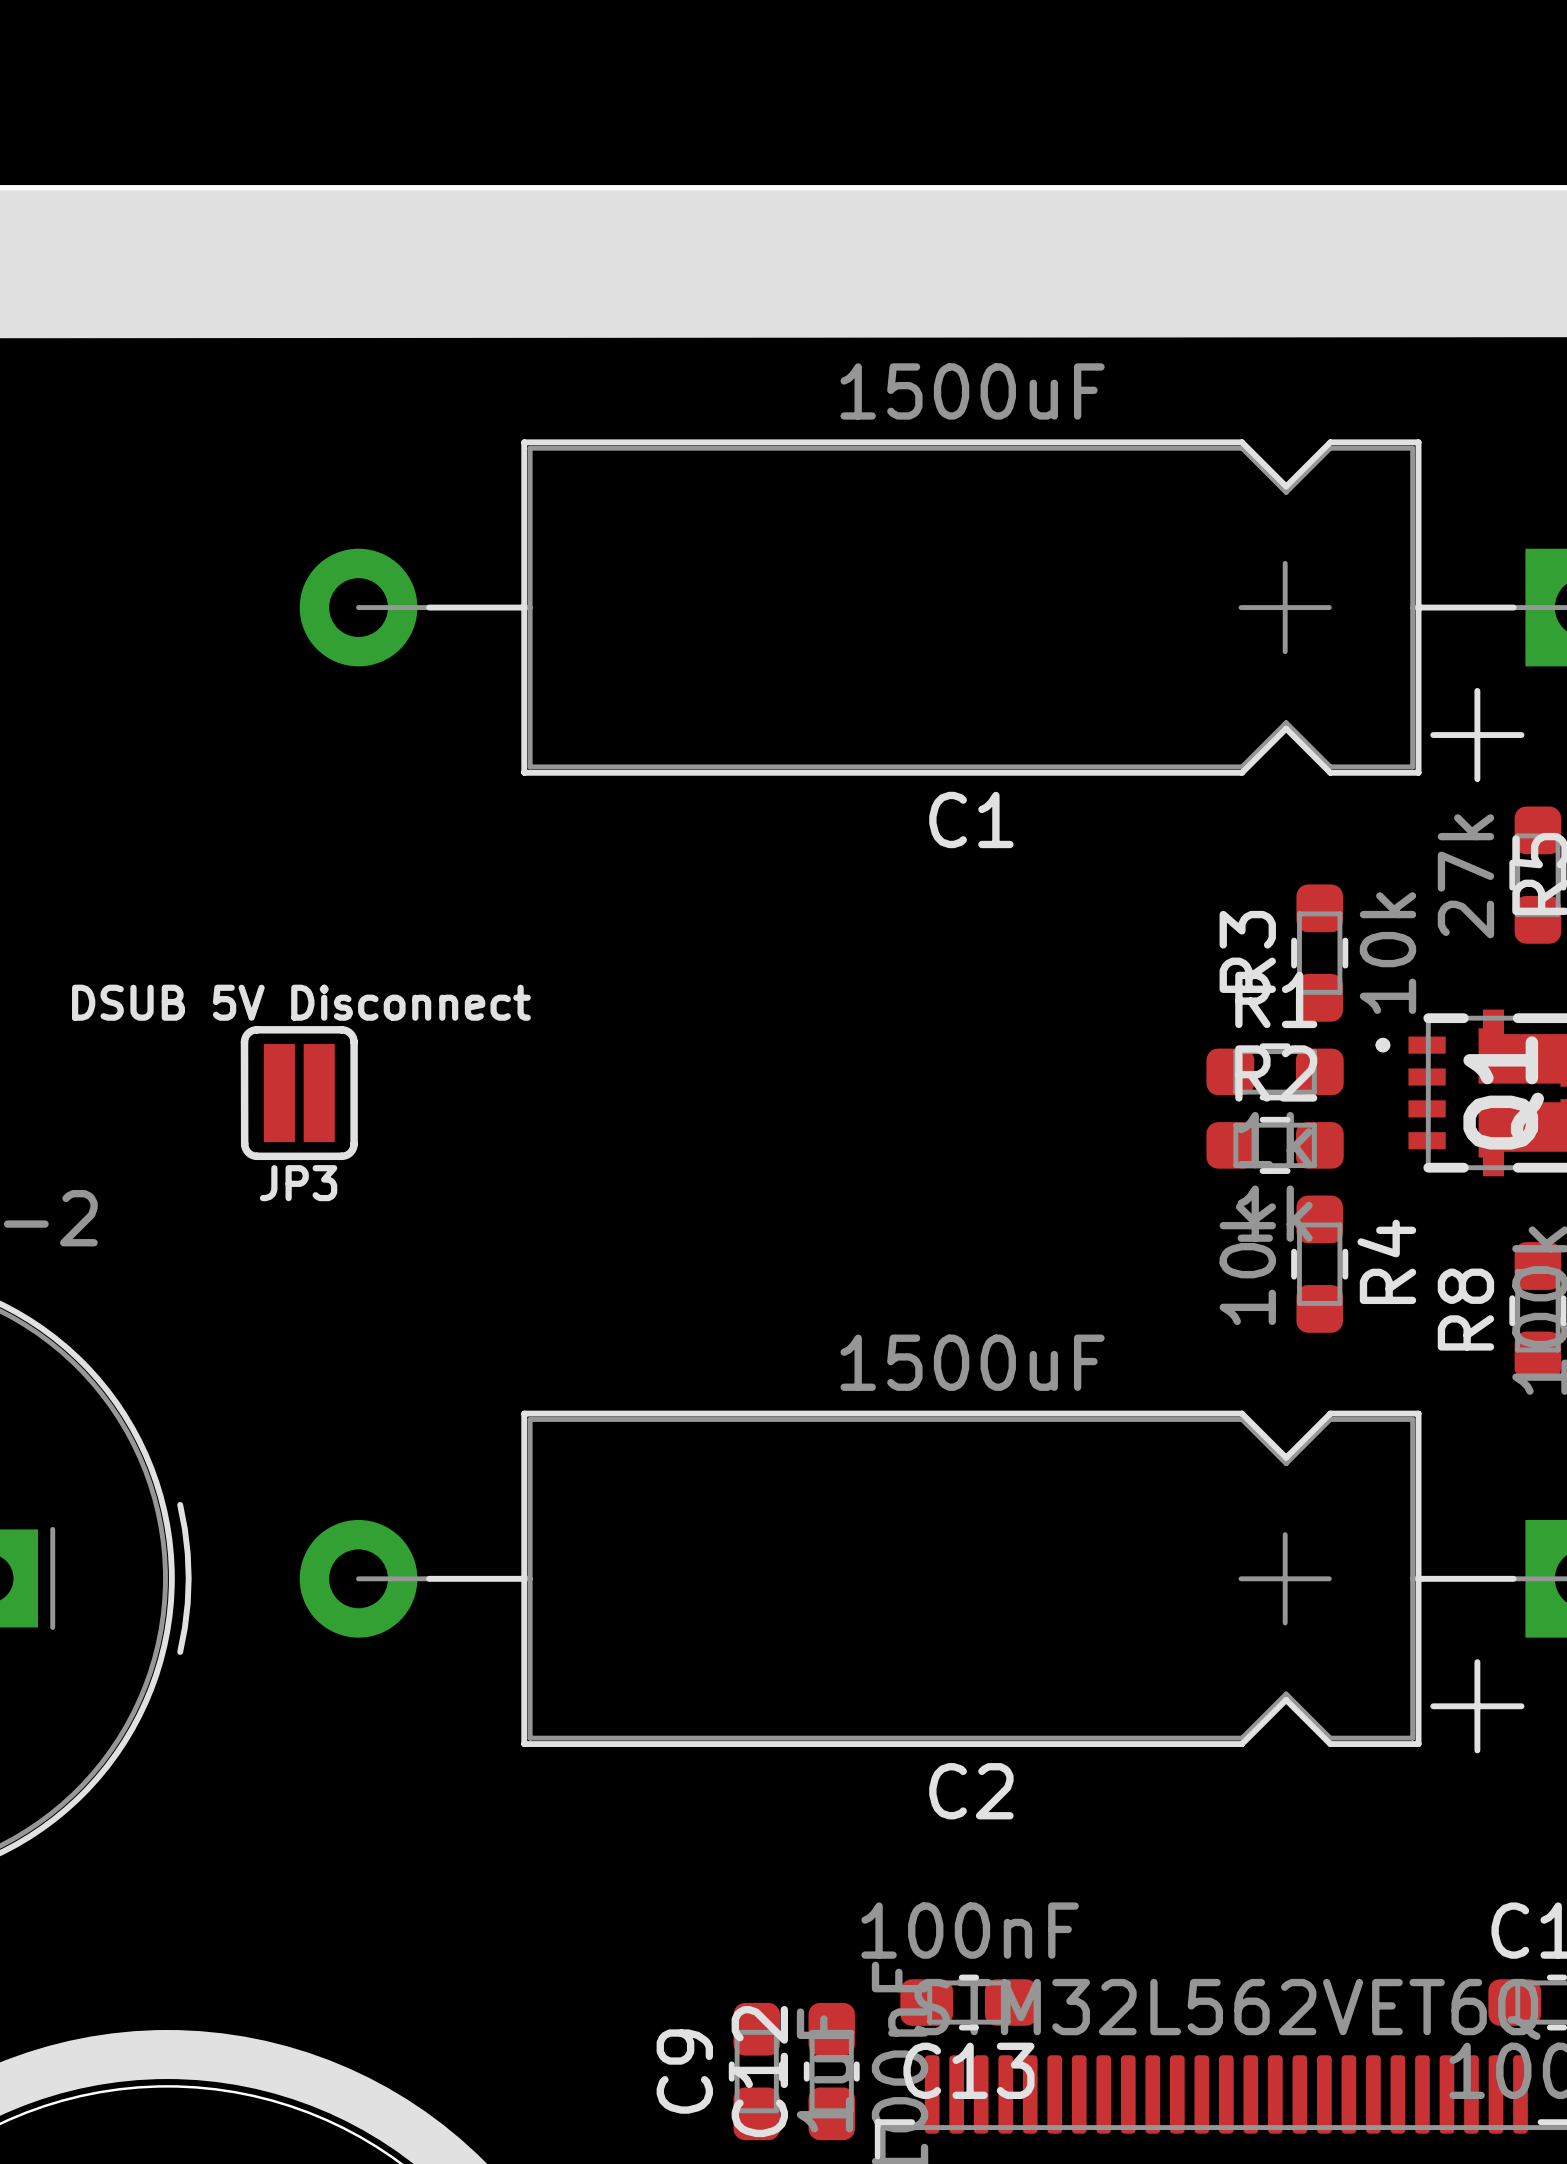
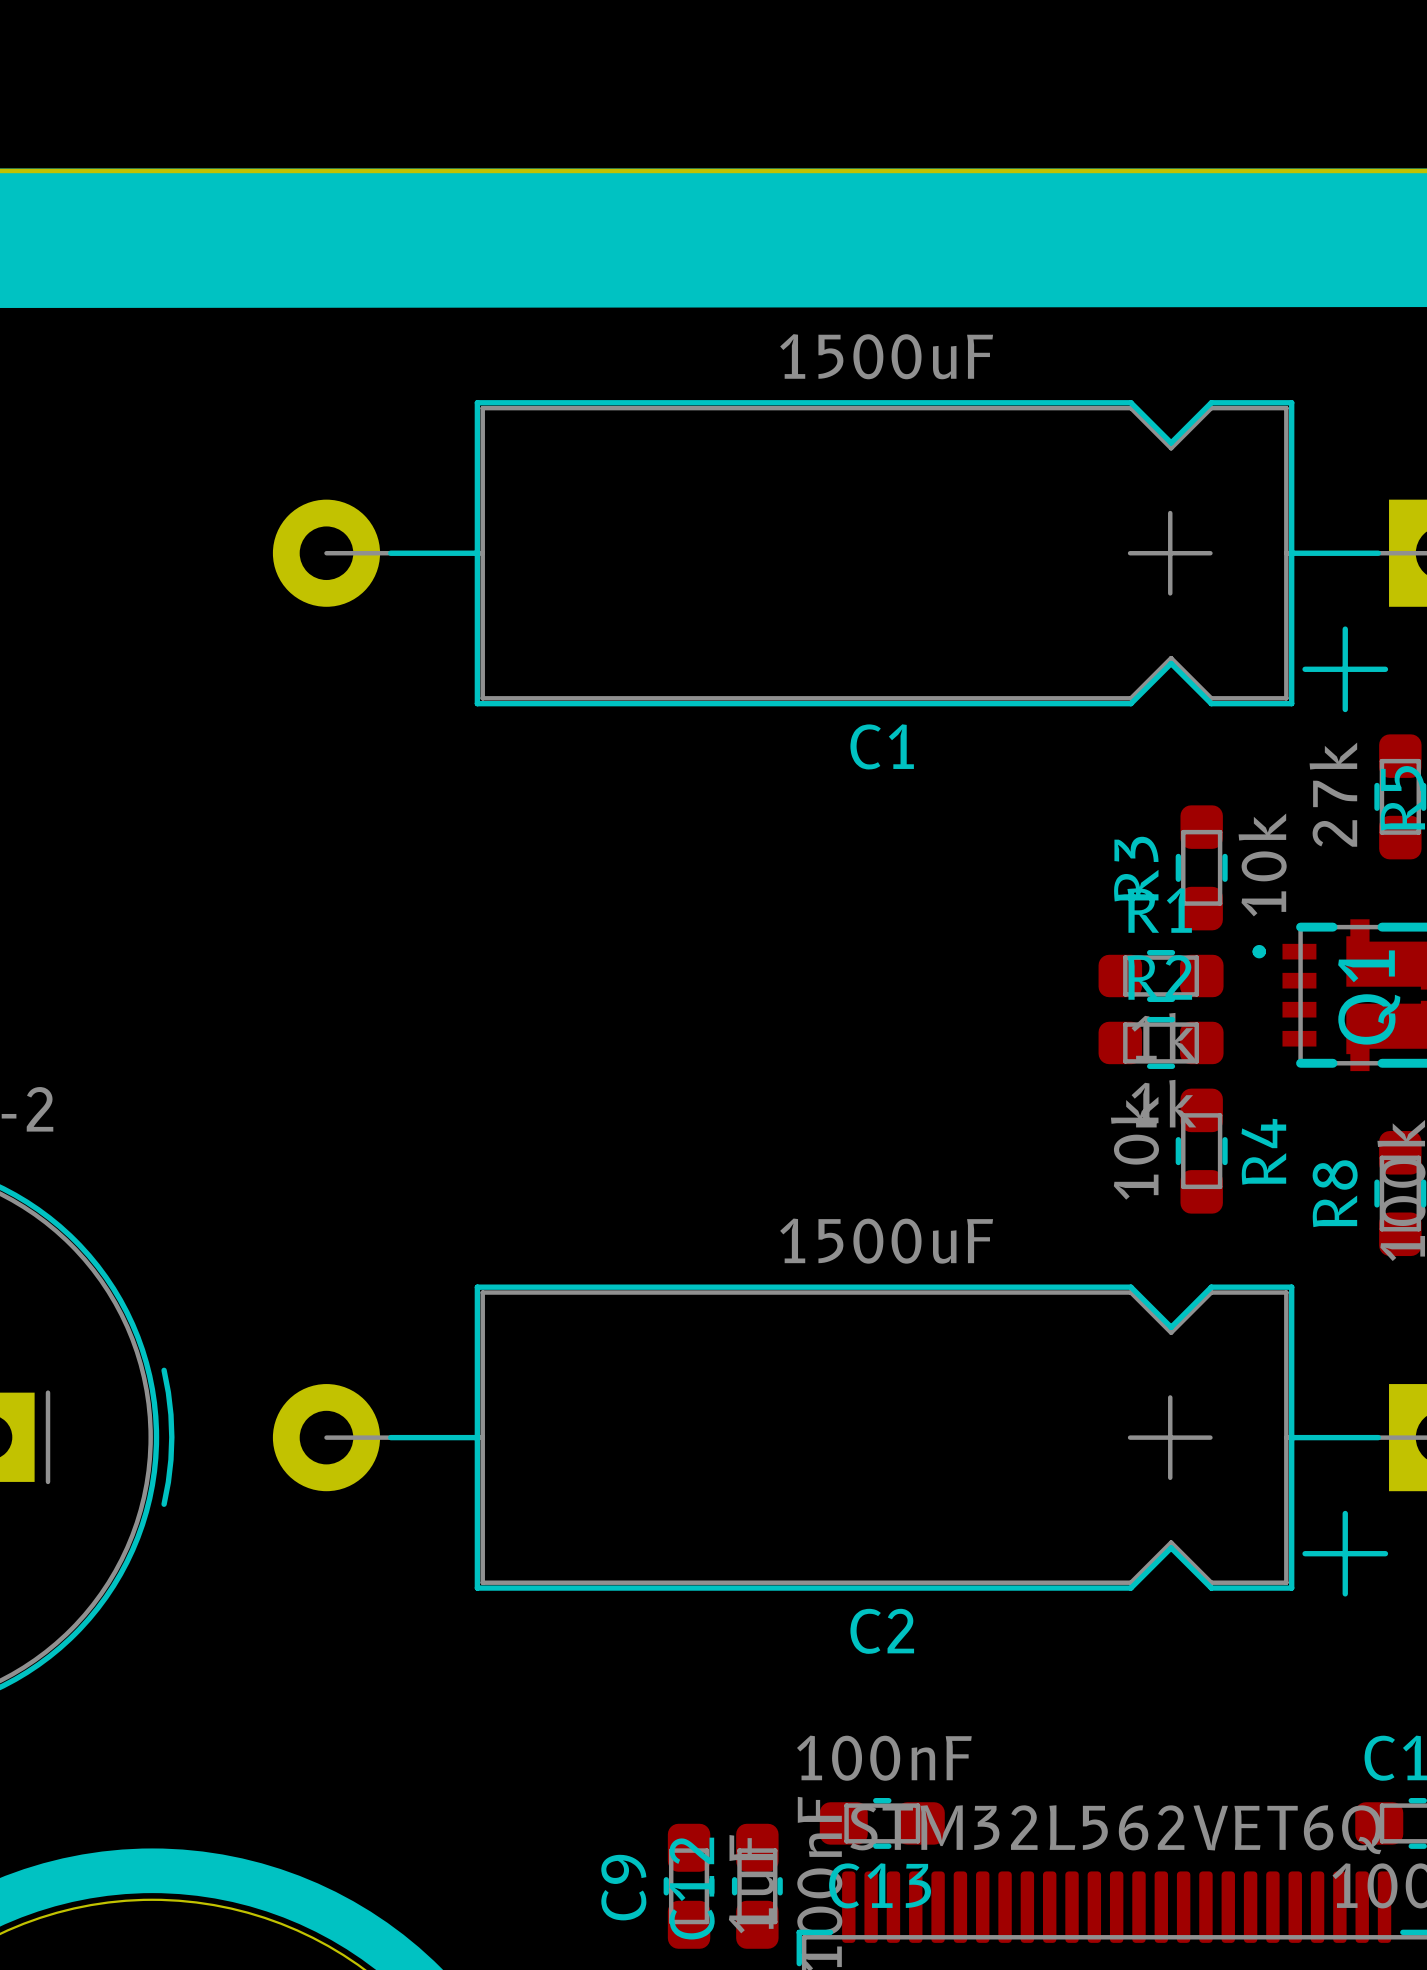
JP3: DSUB 5V Disconnect (299, 1093) -> none

